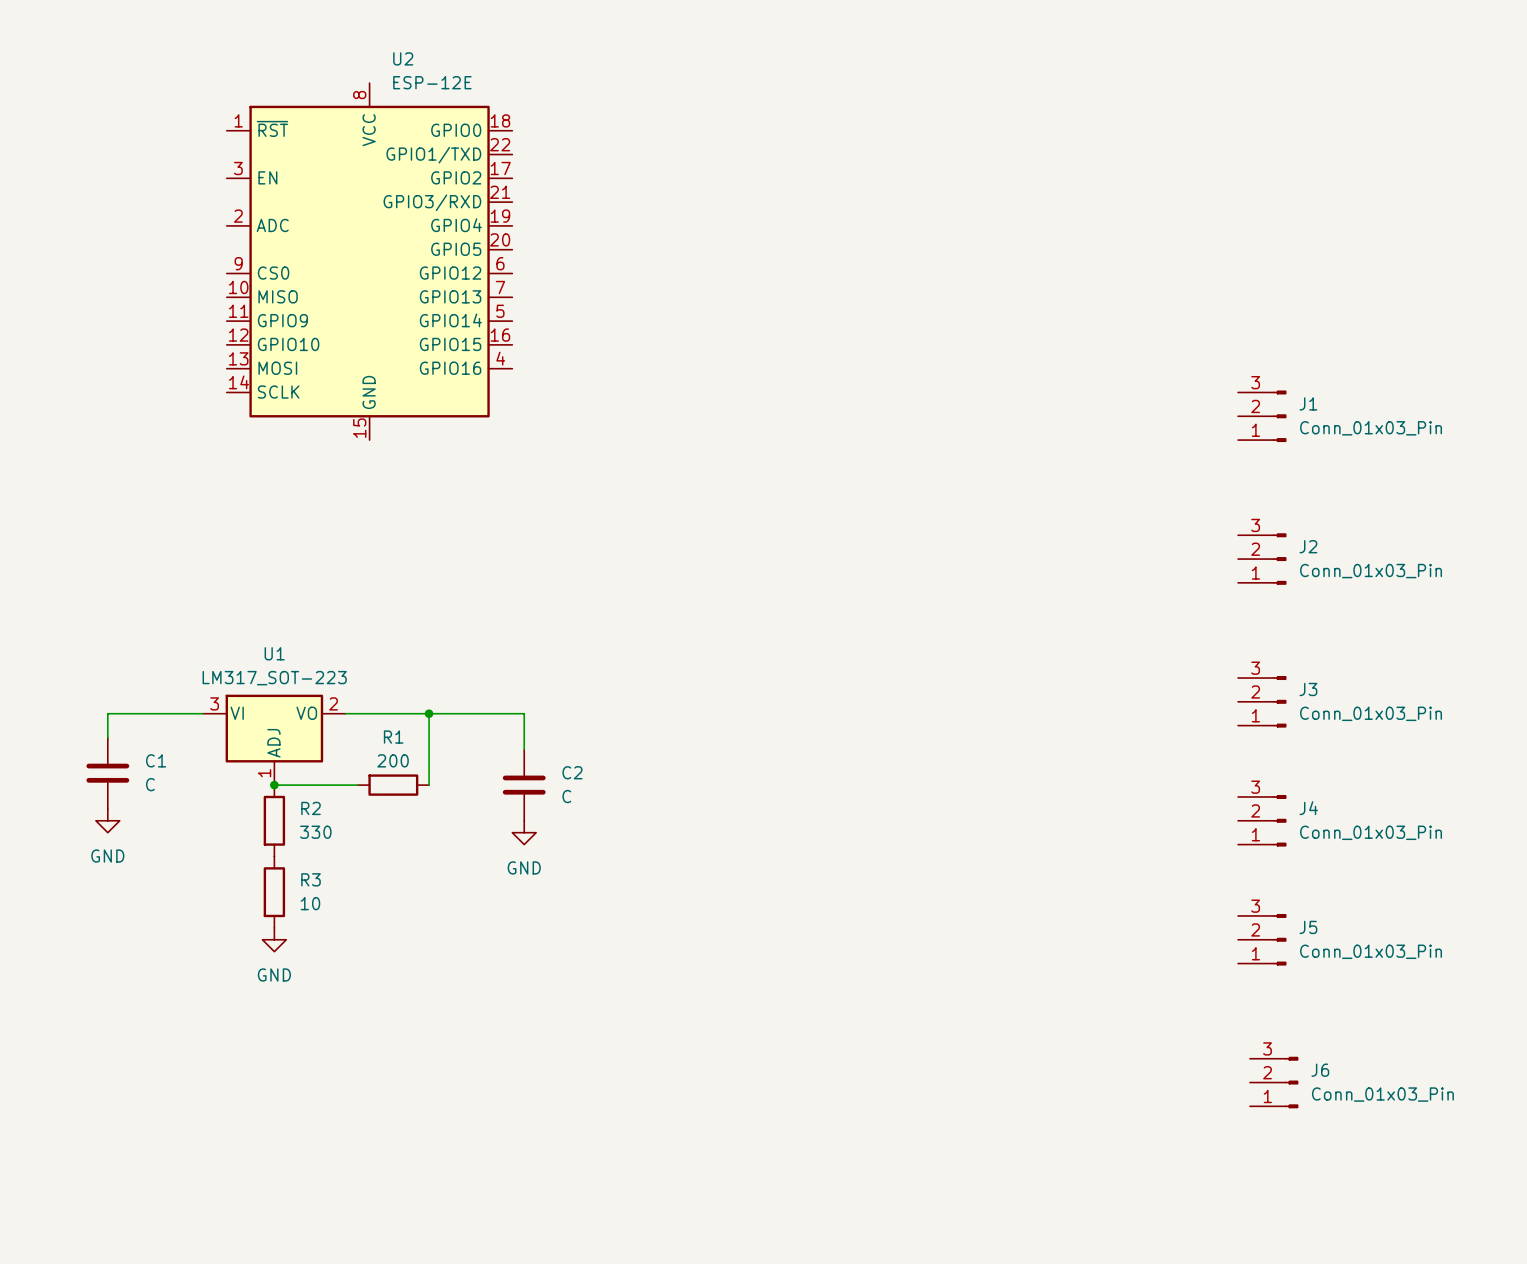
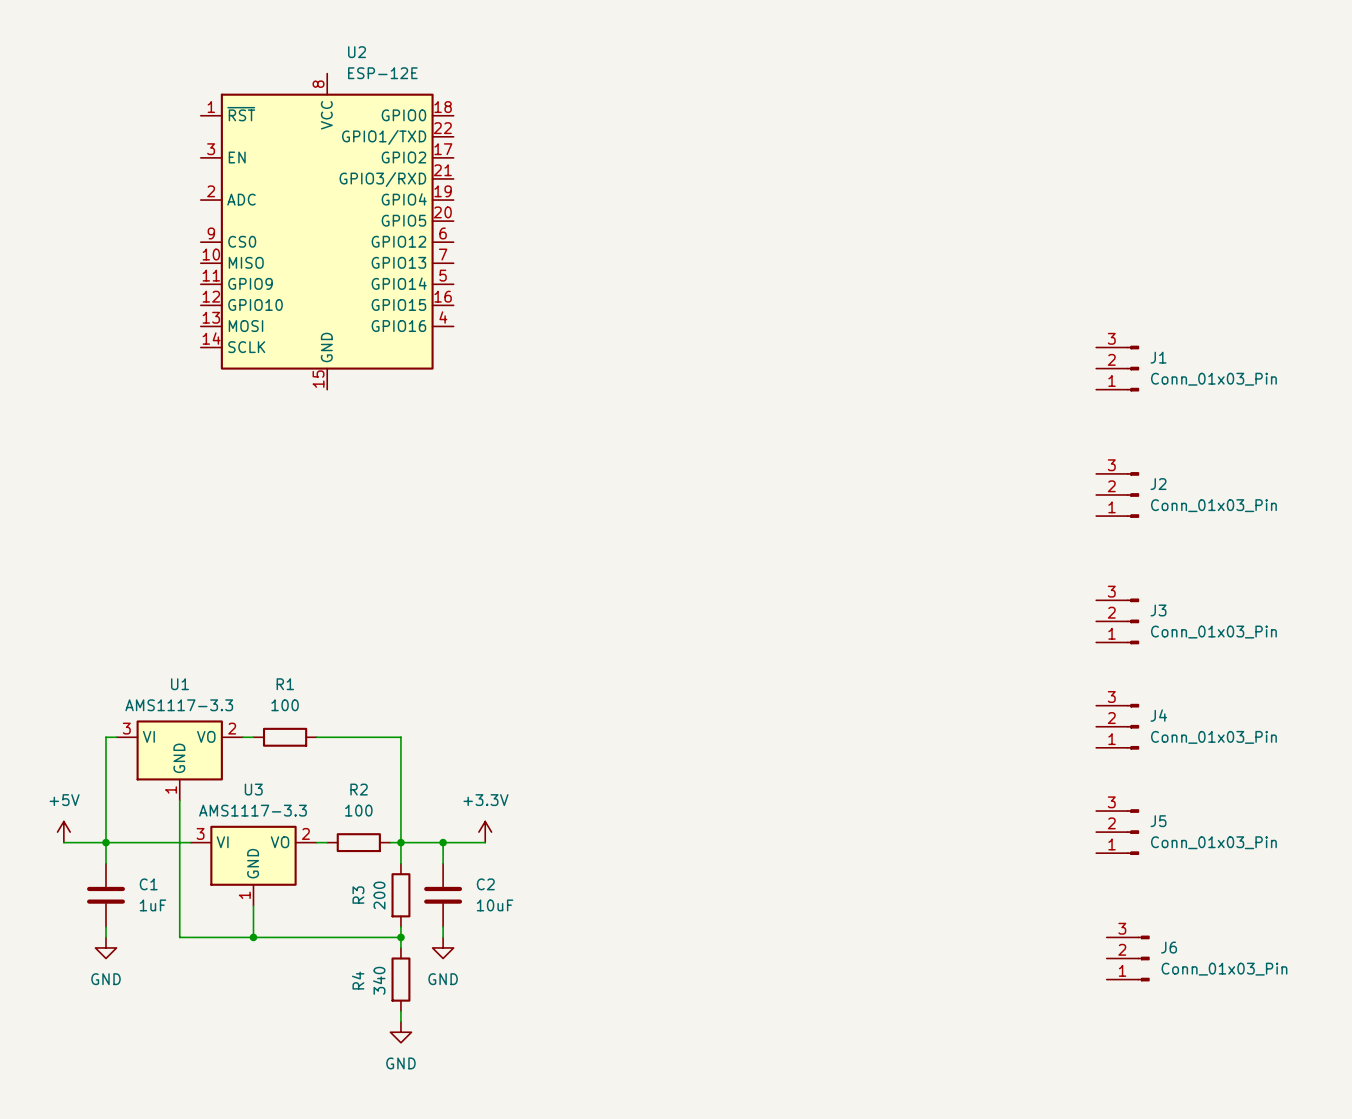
U1 value: LM317_SOT-223 (274, 678) -> AMS1117-3.3 (179, 705)
wire: (203, 713) (107, 713) (107, 737) -> none
wire: (345, 713) (524, 713) (524, 749) -> none
wire: (429, 713) (429, 785) -> none
junction: (429, 713) -> none
R1 name position: R1 (393, 737) -> R1 (285, 684)
U1 position: (274, 739) -> (179, 760)
U1 pin name: ADJ (273, 743) -> GND (179, 758)
R1 value: 200 (393, 760) -> 100 (285, 705)
C1 position: (107, 773) -> (106, 895)
C1 value: C (150, 784) -> 1uF (152, 905)
wire: (274, 785) (357, 785) -> none
junction: (274, 785) -> none
R1 position: (393, 785) -> (285, 737)
C2 position: (524, 785) -> (443, 895)
C2 value: C (566, 796) -> 10uF (495, 905)
R2 name position: R2 (311, 808) -> R2 (359, 789)
power symbol: GND (107, 820) -> none
R2 rotation: 0° (274, 820) -> 90° clockwise (358, 842)
R2 position: (274, 820) -> (358, 842)
wire: none -> (116, 737) (106, 737) (106, 863)
wire: none -> (242, 737) (253, 737)
R2 value: 330 (315, 832) -> 100 (358, 810)
wire: none -> (316, 737) (400, 737) (400, 863)
power symbol: GND (524, 832) -> none
R3 name rotation: 0° (311, 879) -> 90° counterclockwise (358, 895)
R3 name position: R3 (311, 879) -> R3 (358, 895)
R3 position: (274, 892) -> (400, 895)
R3 value: 10 (310, 903) -> 200 (379, 895)
wire: none -> (179, 800) (179, 937) (400, 937)
power symbol: none -> +5V (63, 832)
power symbol: GND (274, 939) -> none
power symbol: none -> +3.3V (485, 832)
wire: none -> (63, 842) (190, 842)
junction: none -> (106, 842)
wire: none -> (316, 842) (327, 842)
wire: none -> (390, 842) (485, 842)
junction: none -> (400, 842)
wire: none -> (443, 842) (443, 863)
junction: none -> (443, 842)
U3: none -> AMS1117-3.3 (253, 865)
wire: none -> (253, 905) (253, 937)
wire: none -> (106, 926) (106, 937)
wire: none -> (400, 926) (400, 947)
wire: none -> (443, 926) (443, 937)
junction: none -> (253, 937)
junction: none -> (400, 937)
power symbol: none -> GND (106, 947)
power symbol: none -> GND (443, 947)
R4: none -> 340 (400, 979)
wire: none -> (400, 1011) (400, 1021)
power symbol: none -> GND (400, 1032)

